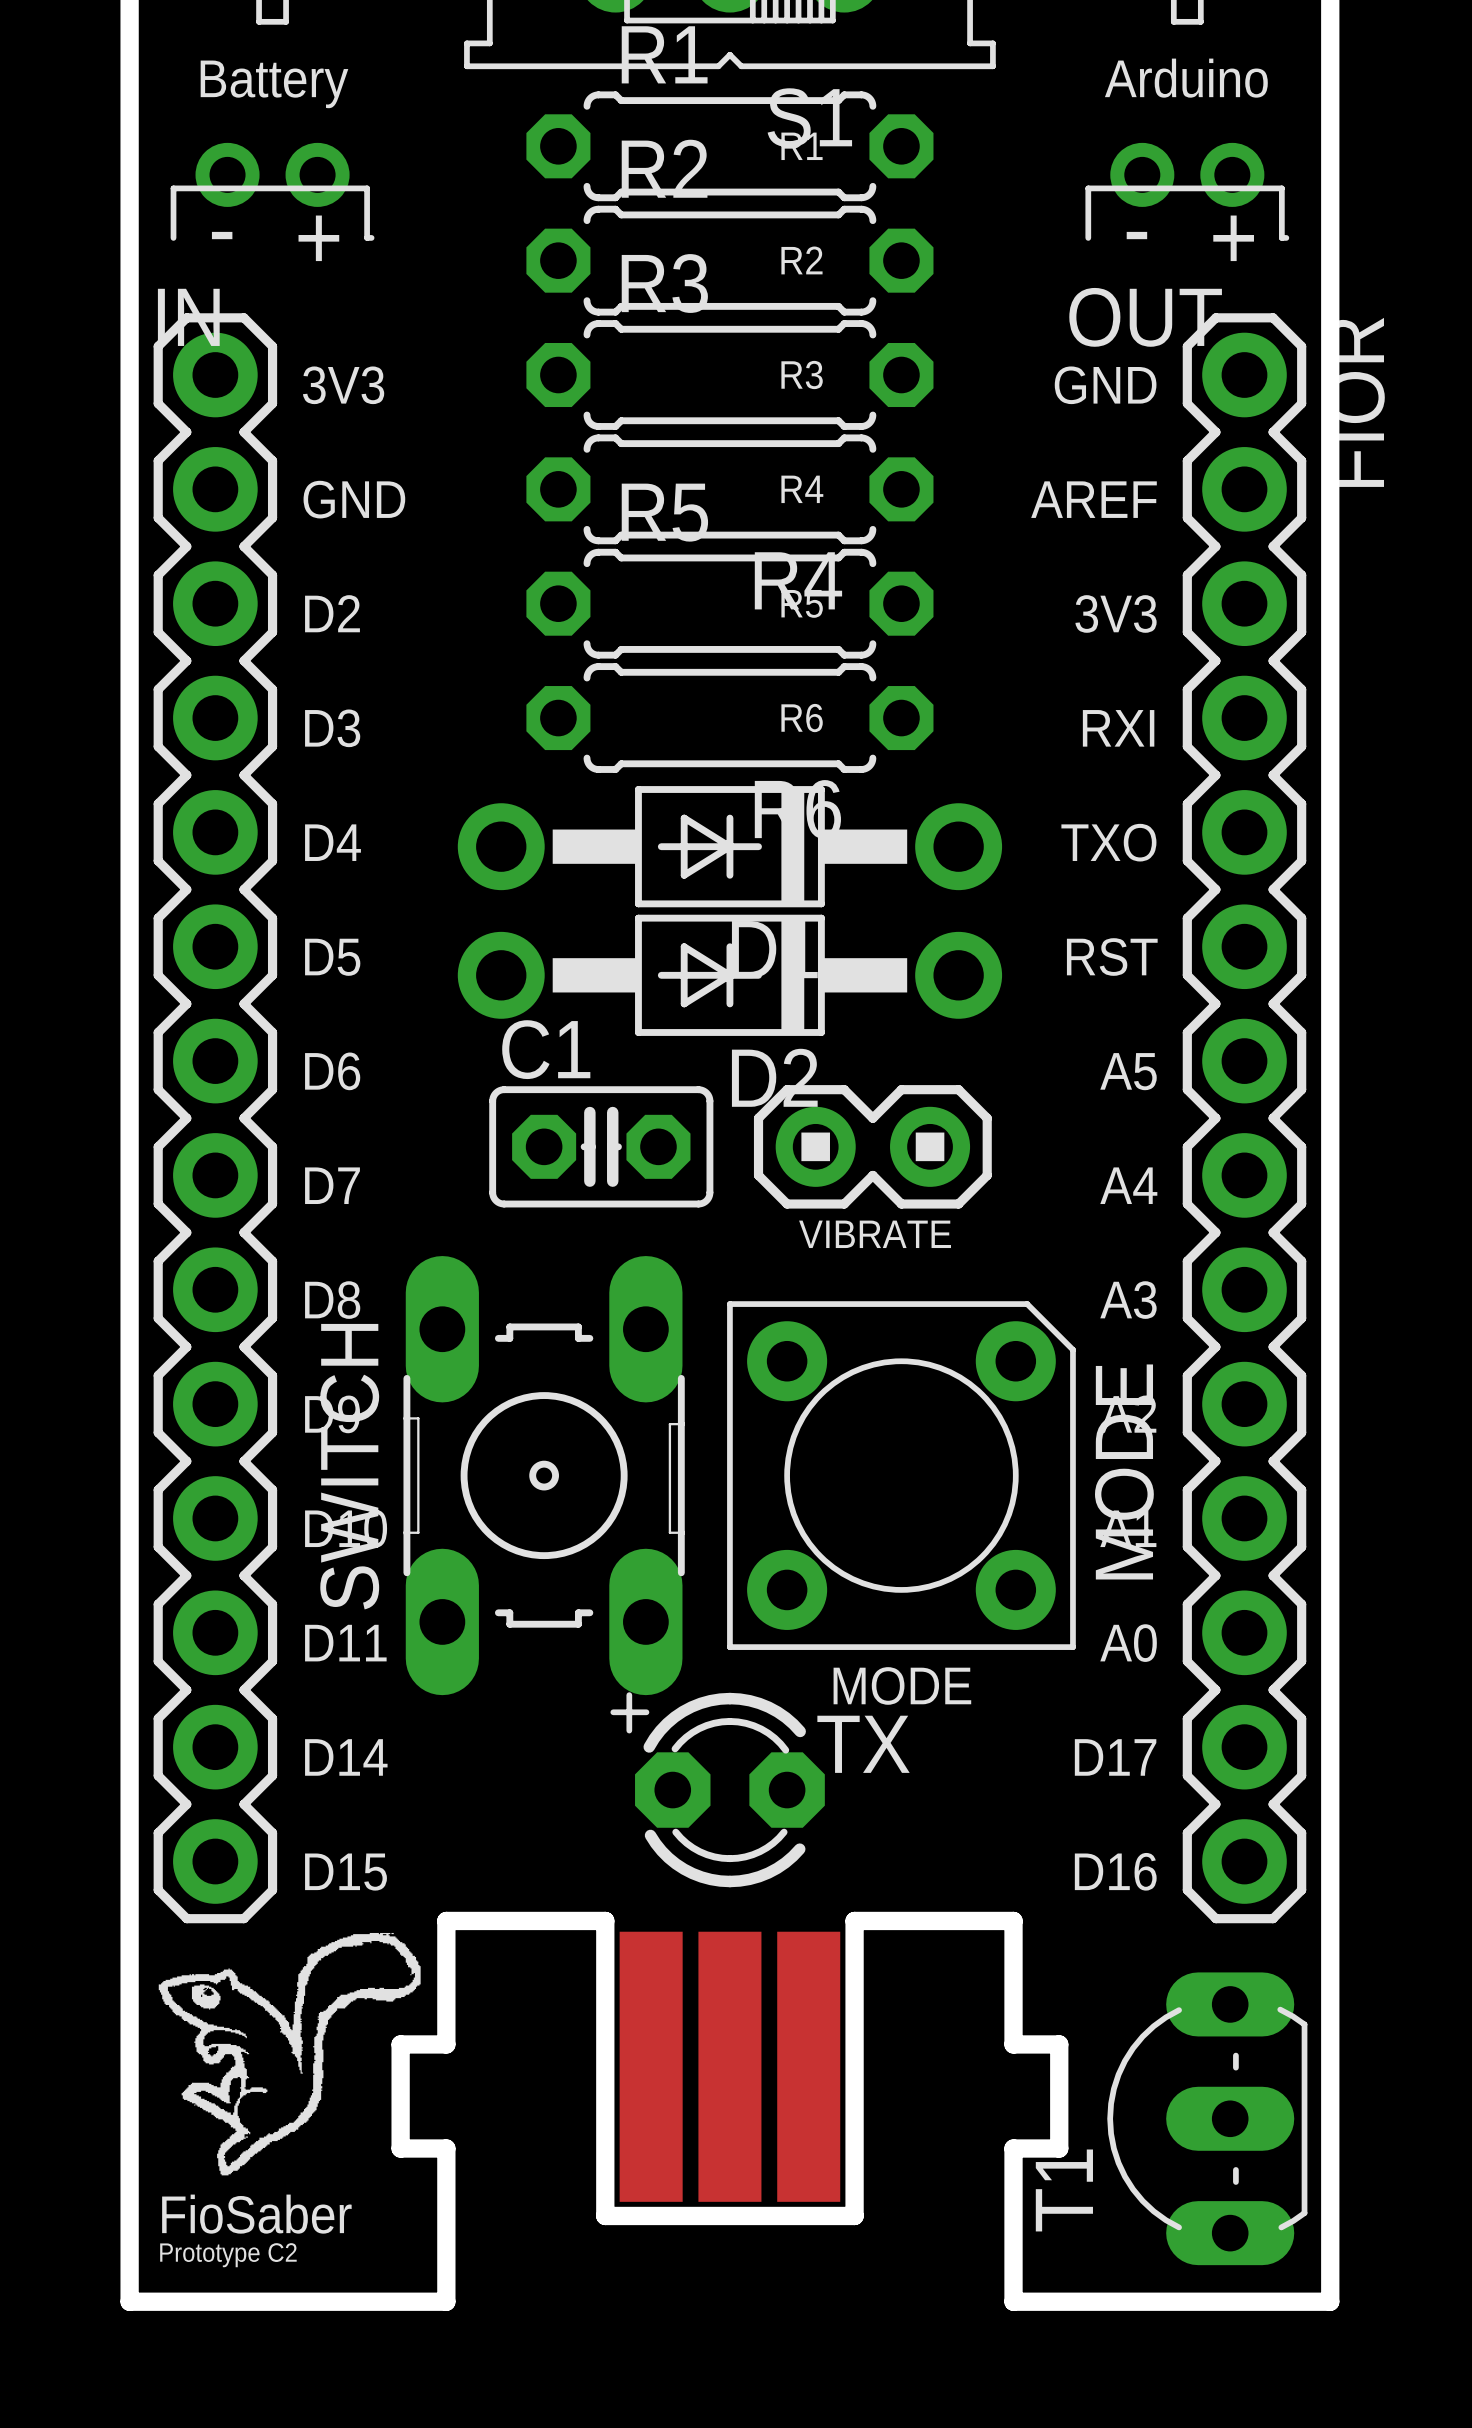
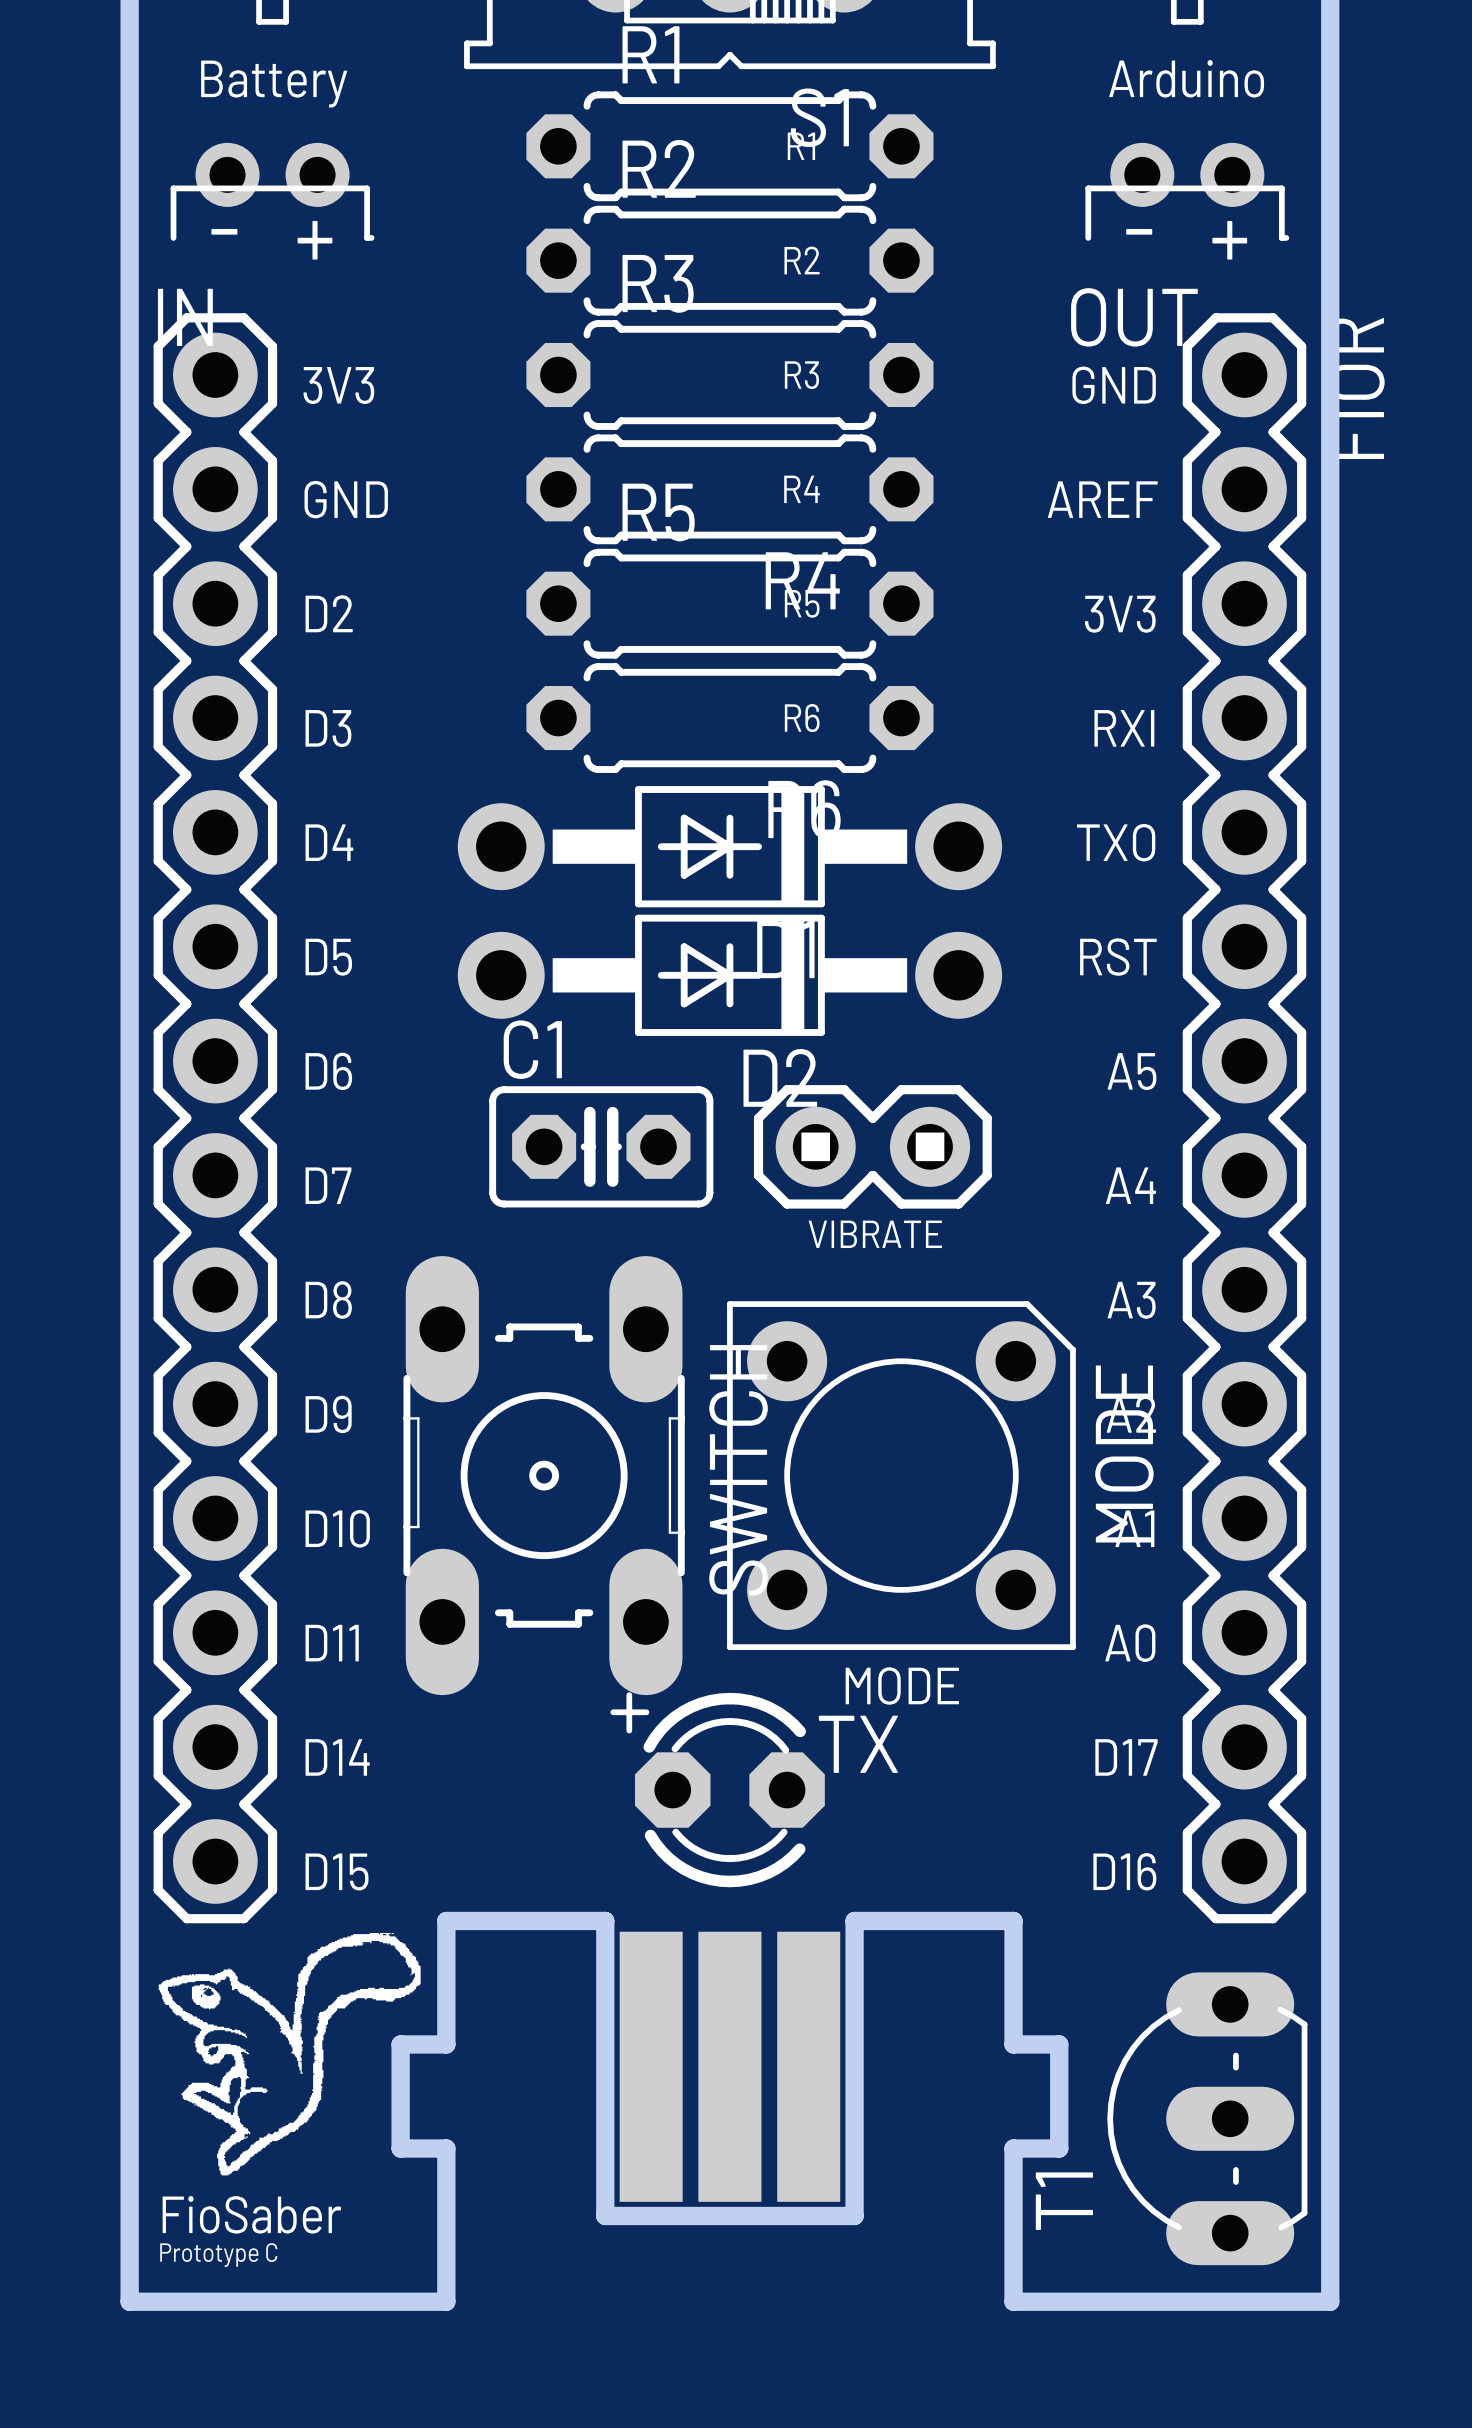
SWITCH rotation: 0° (544, 1475) -> 180° (544, 1475)
text: Prototype C2 (228, 2255) -> Prototype C (218, 2255)

